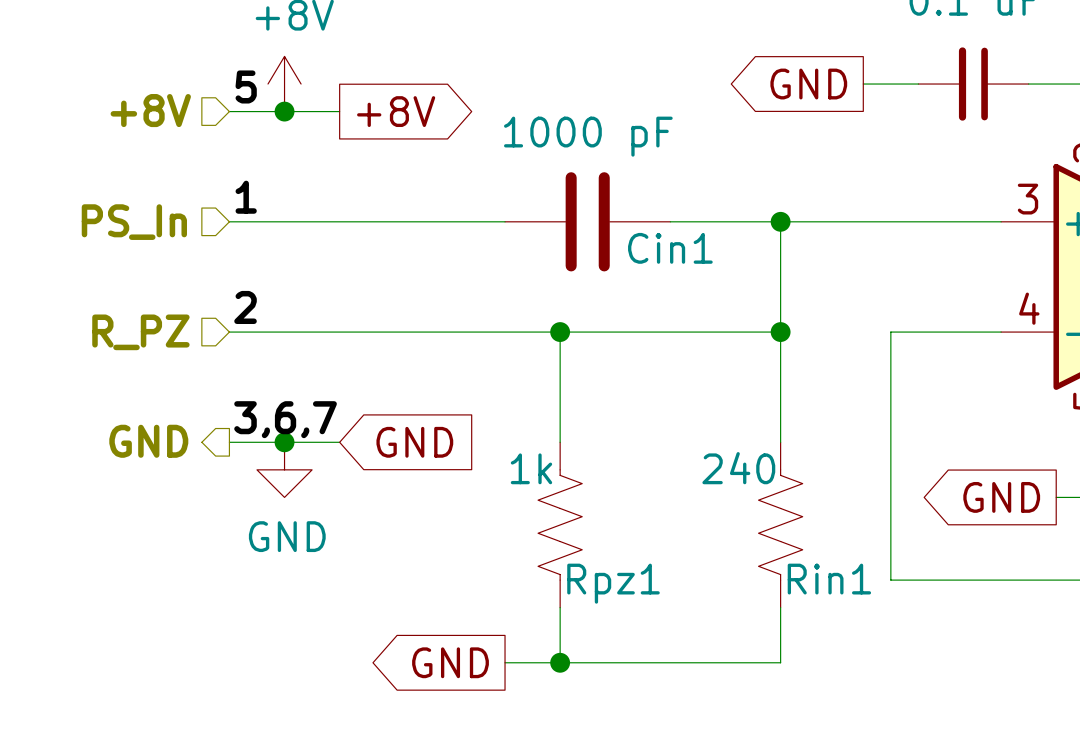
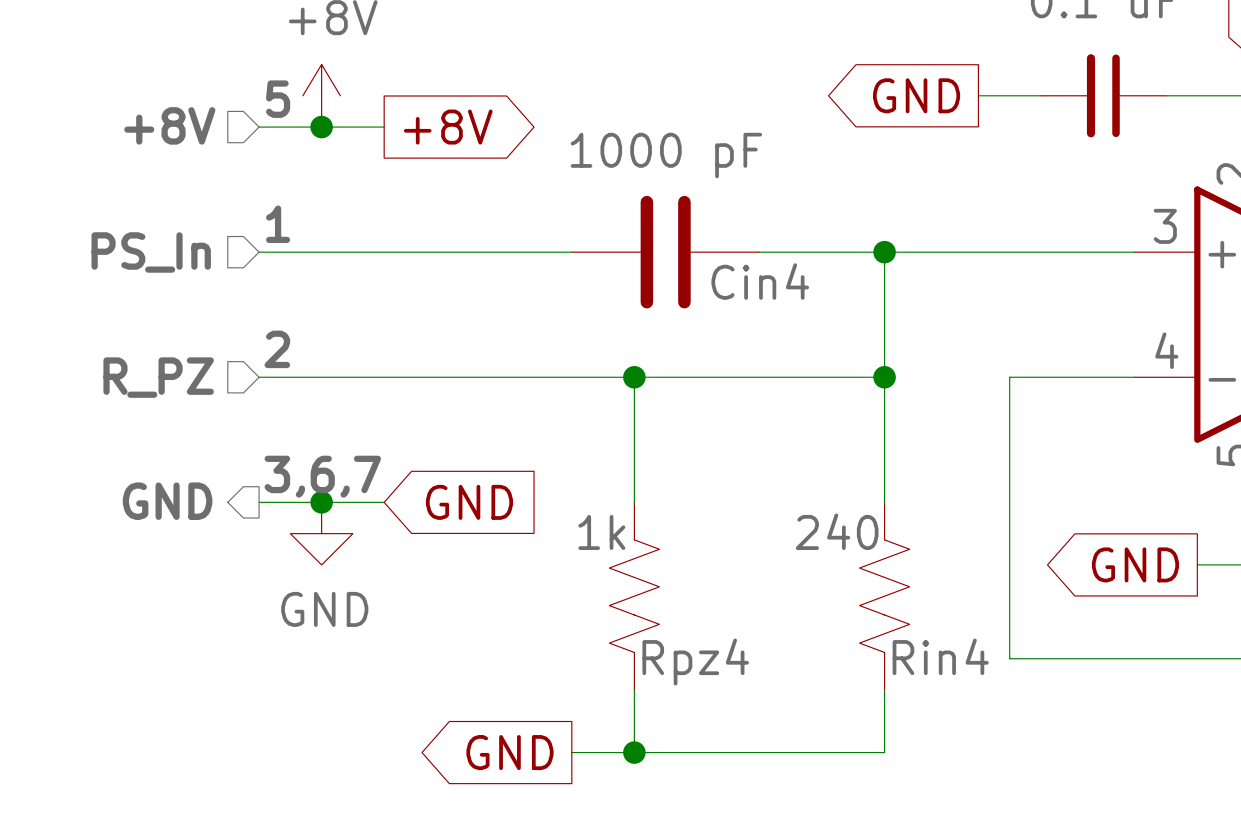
Cin1 name: Cin1 (670, 248) -> Cin4 (760, 281)
Rin1 name: Rin1 (829, 579) -> Rin4 (940, 656)
Rpz1 name: Rpz1 (613, 583) -> Rpz4 (695, 662)

